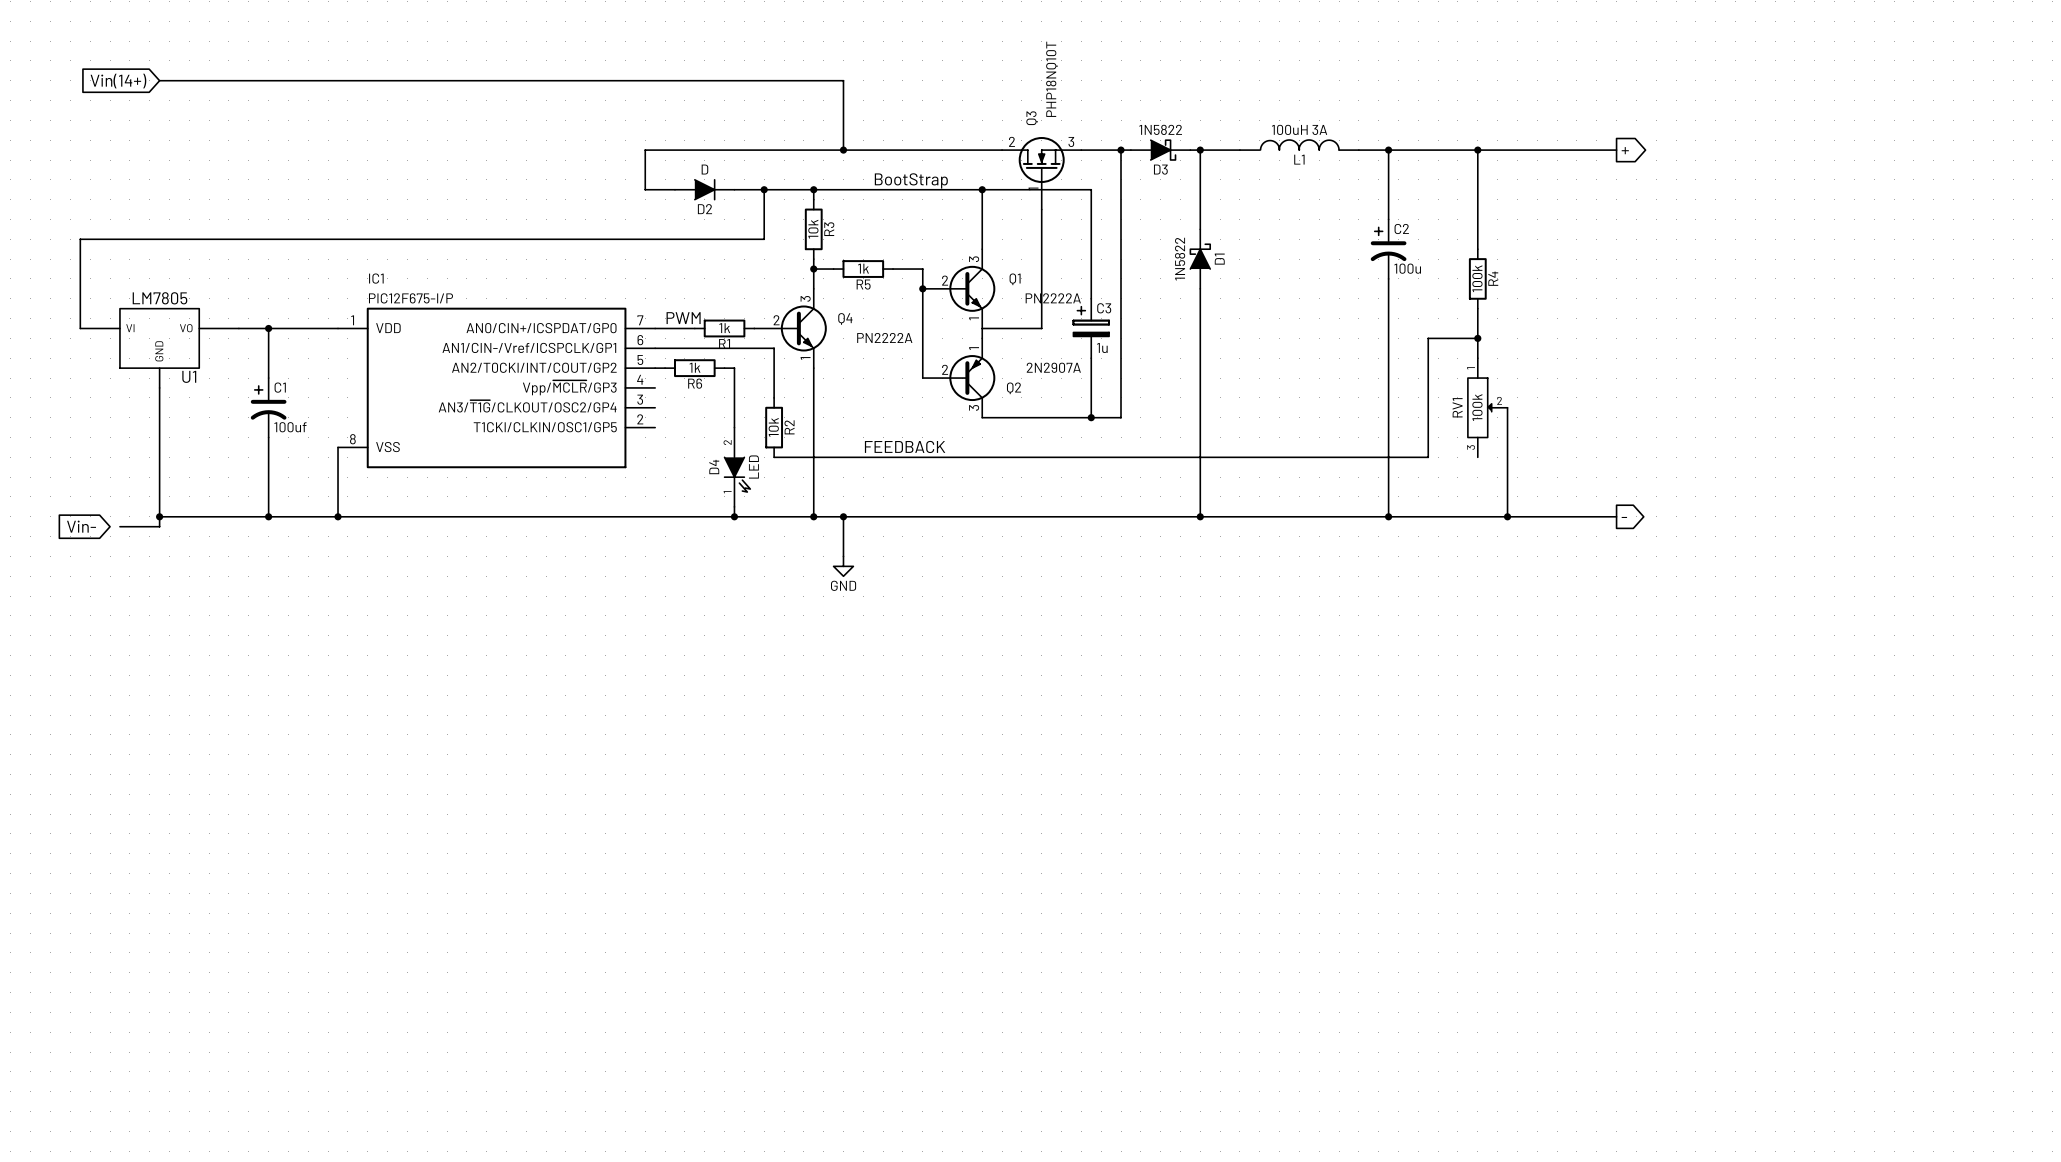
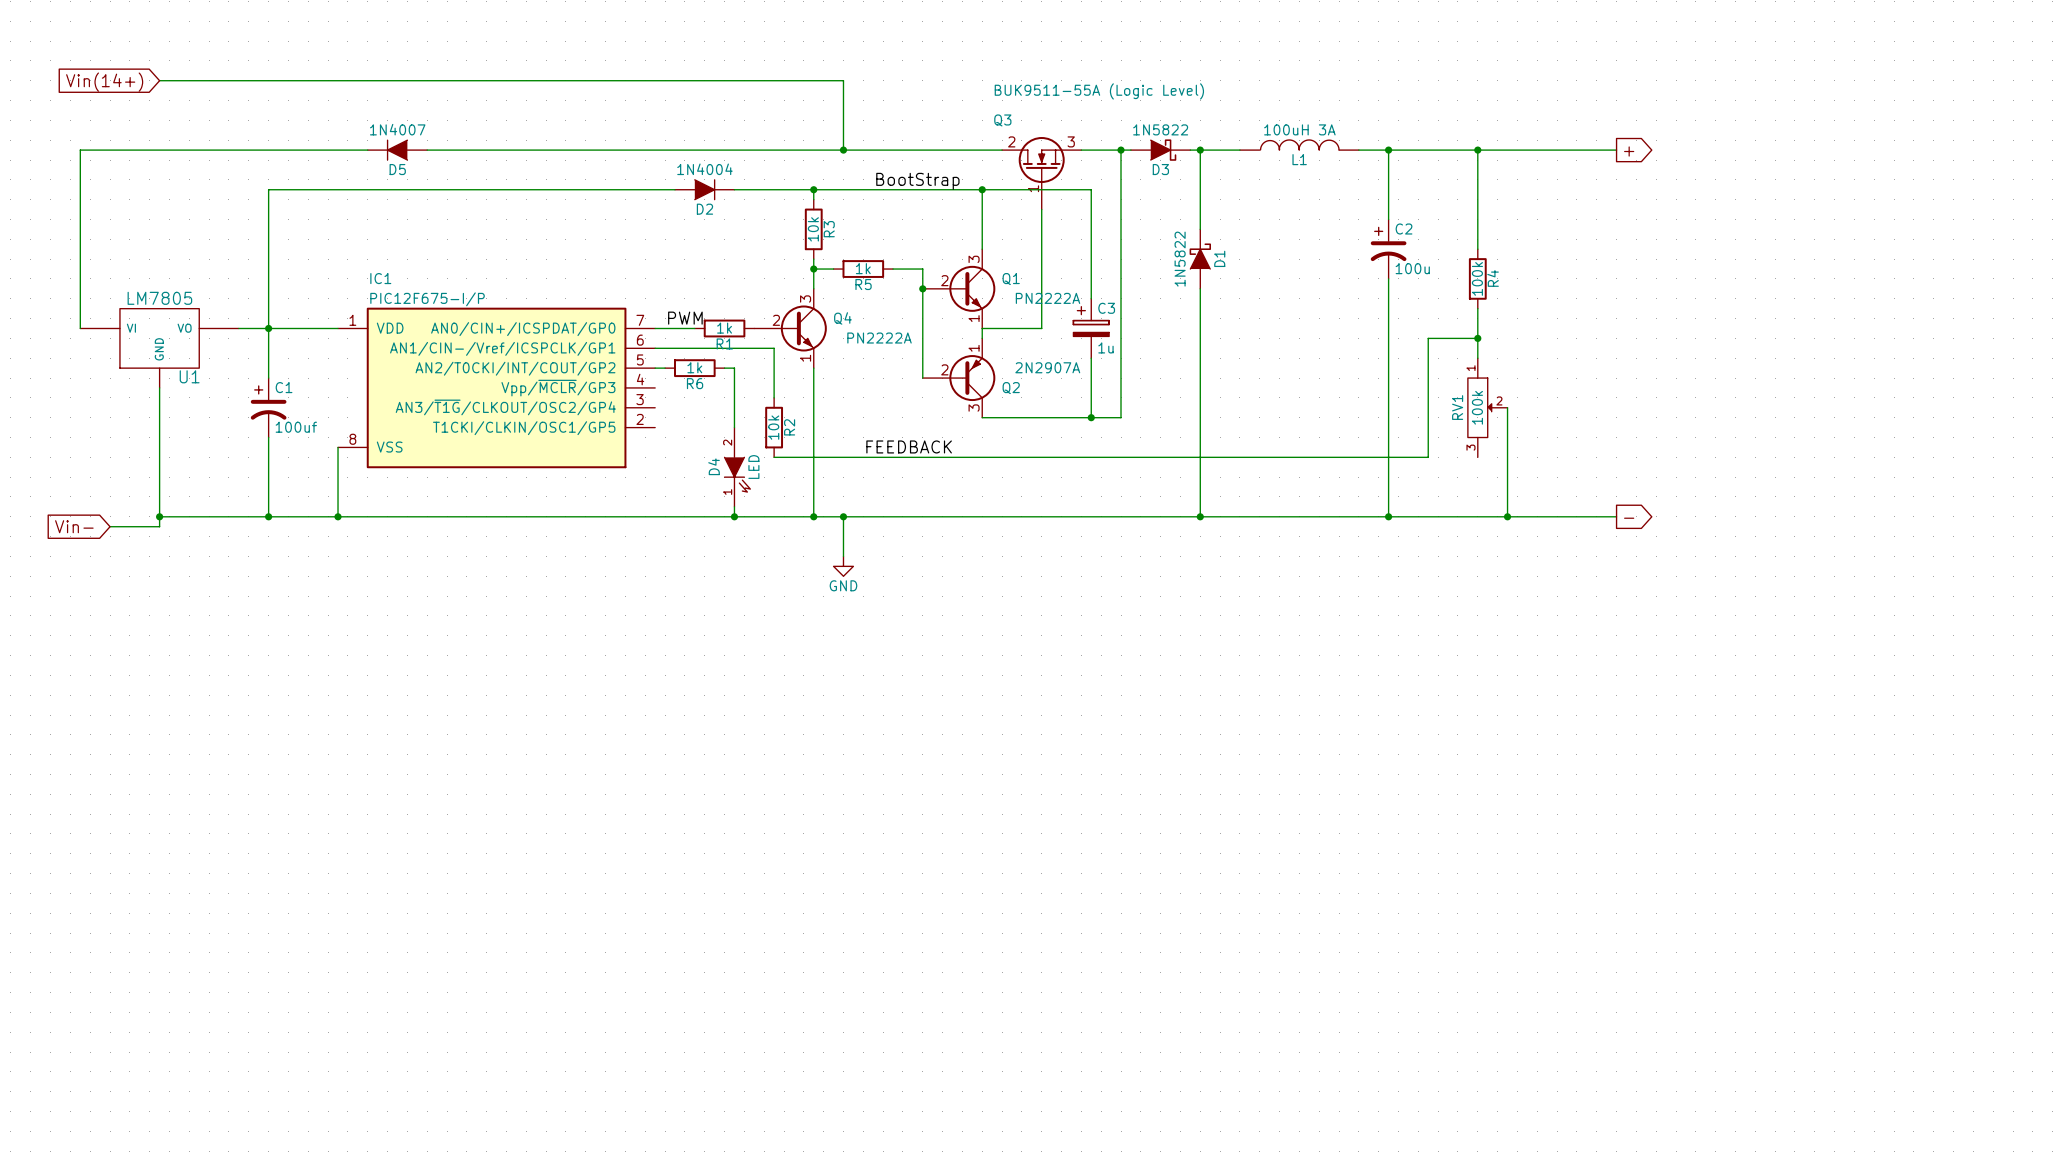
Q3 value: PHP18NQ10T (1051, 79) -> BUK9511-55A (Logic Level) (1099, 91)
Q3 name rotation: 0° (1032, 118) -> 90° clockwise (1002, 120)
Q3 name position: Q3 (1032, 118) -> Q3 (1002, 120)
D5: none -> 1N4007 (397, 150)
wire: (645, 150) (645, 189) -> (645, 150) (427, 150)
D2 value: D (704, 169) -> 1N4004 (704, 169)
wire: none -> (645, 189) (268, 189) (268, 328)
wire: (764, 189) (764, 239) (80, 239) -> (367, 150) (80, 150) (80, 239)
junction: (764, 189) -> none
wire: none -> (110, 526) (119, 526)

